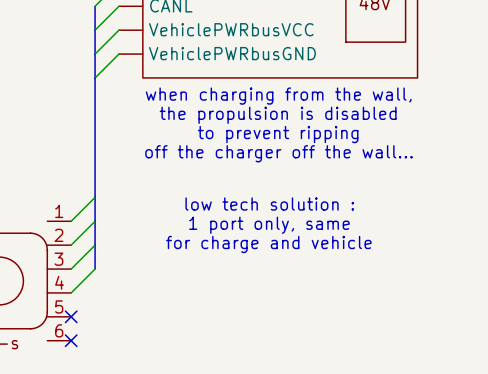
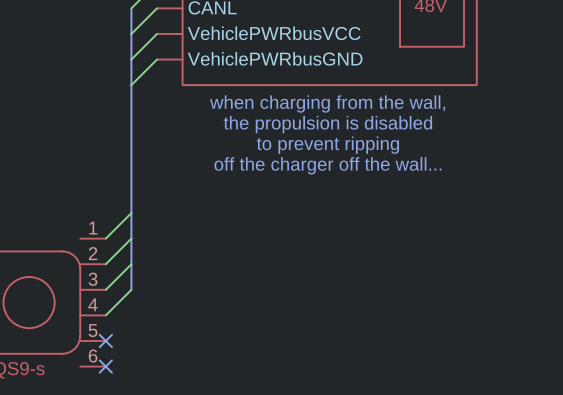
text: low tech solution : (269, 204) -> none
text: 1 port only, same (269, 225) -> none
text: for charge and vehicle (268, 244) -> none

